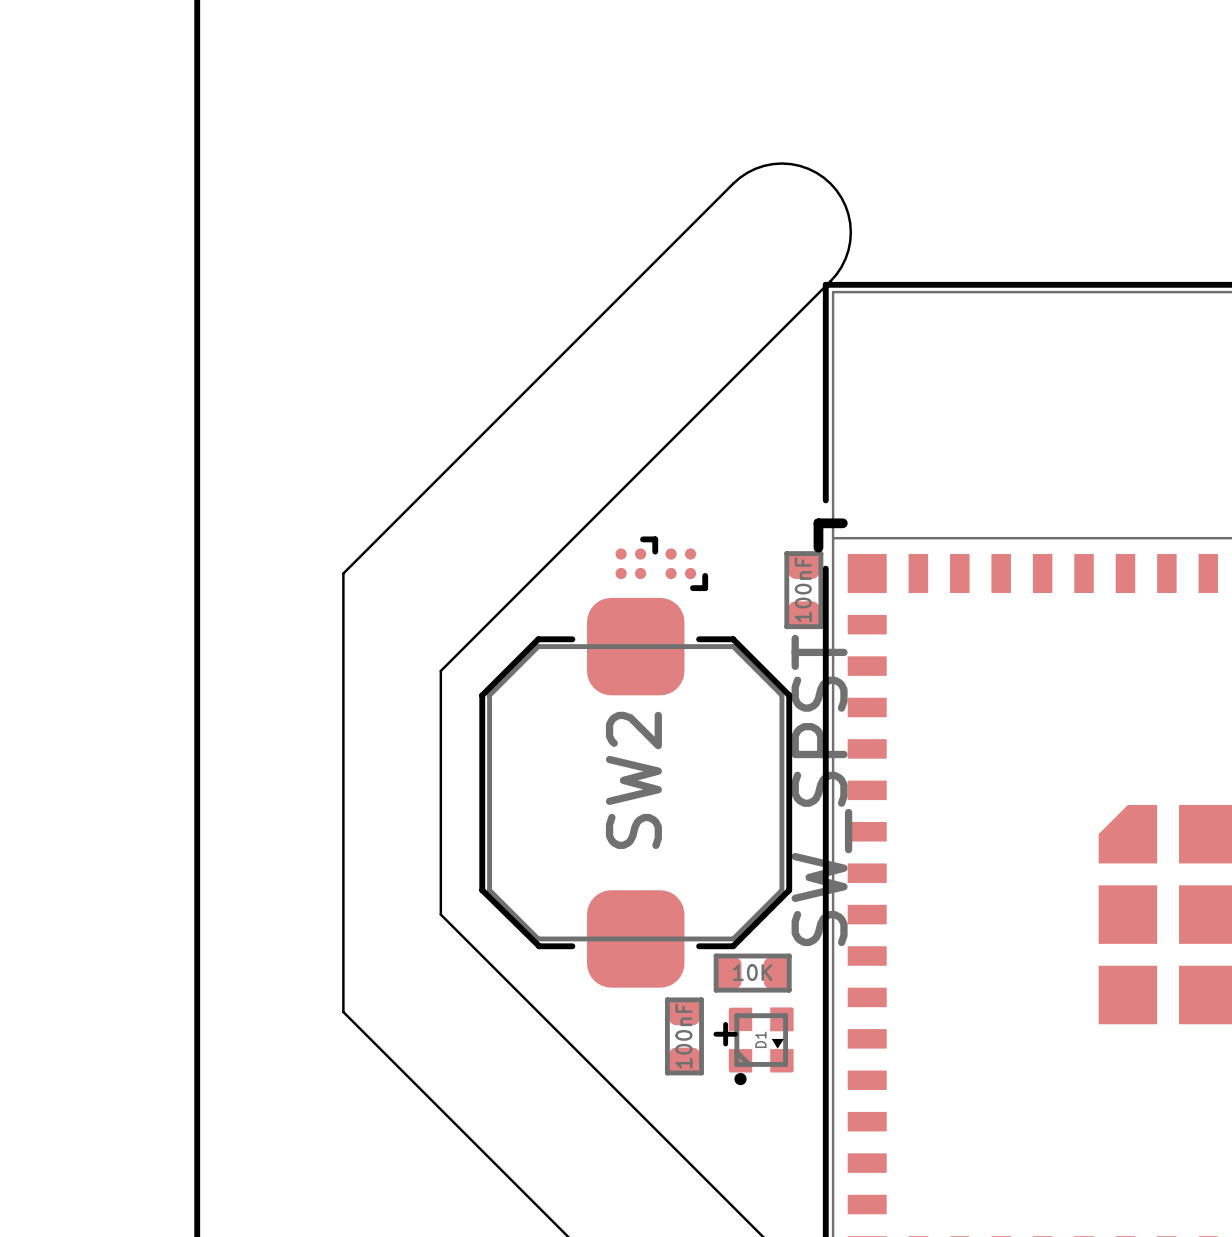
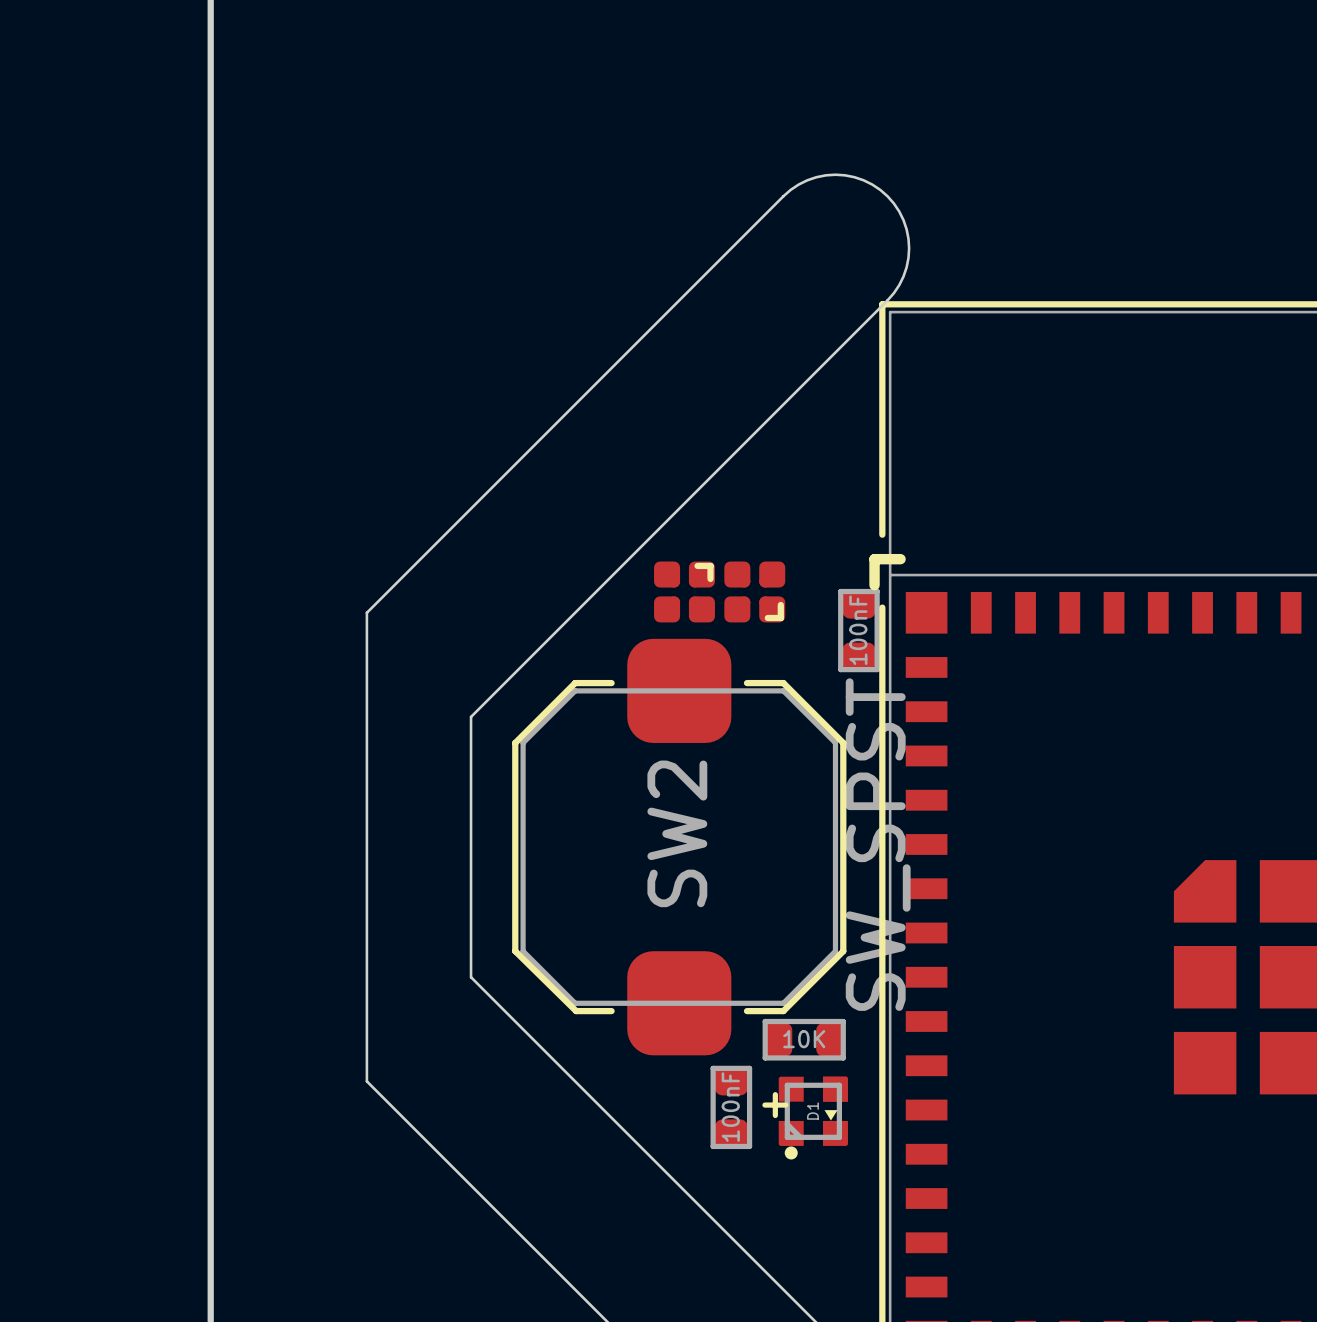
part footprint: [615, 536, 659, 580] -> [654, 561, 715, 623]
part: none -> (754, 591)
part: (686, 569) -> none

